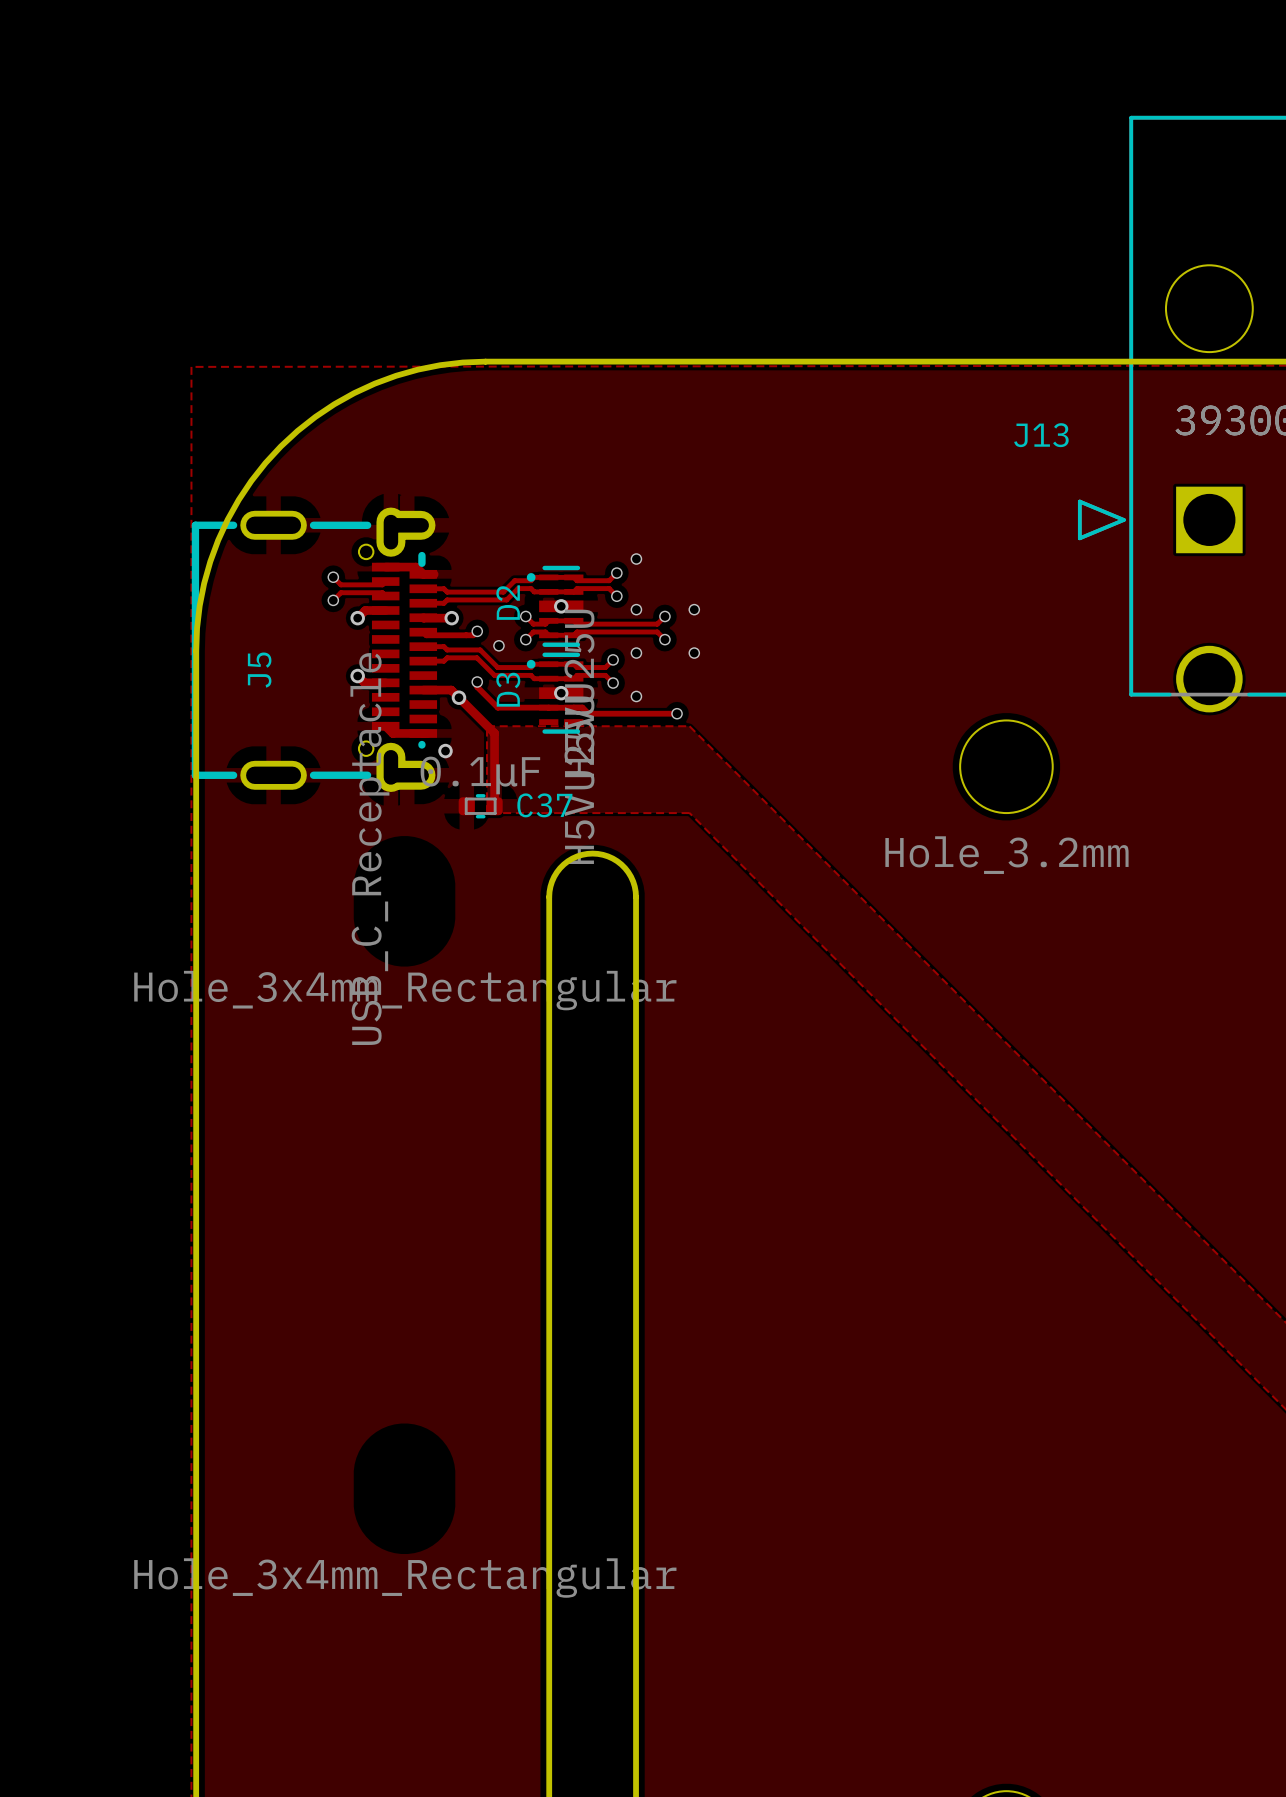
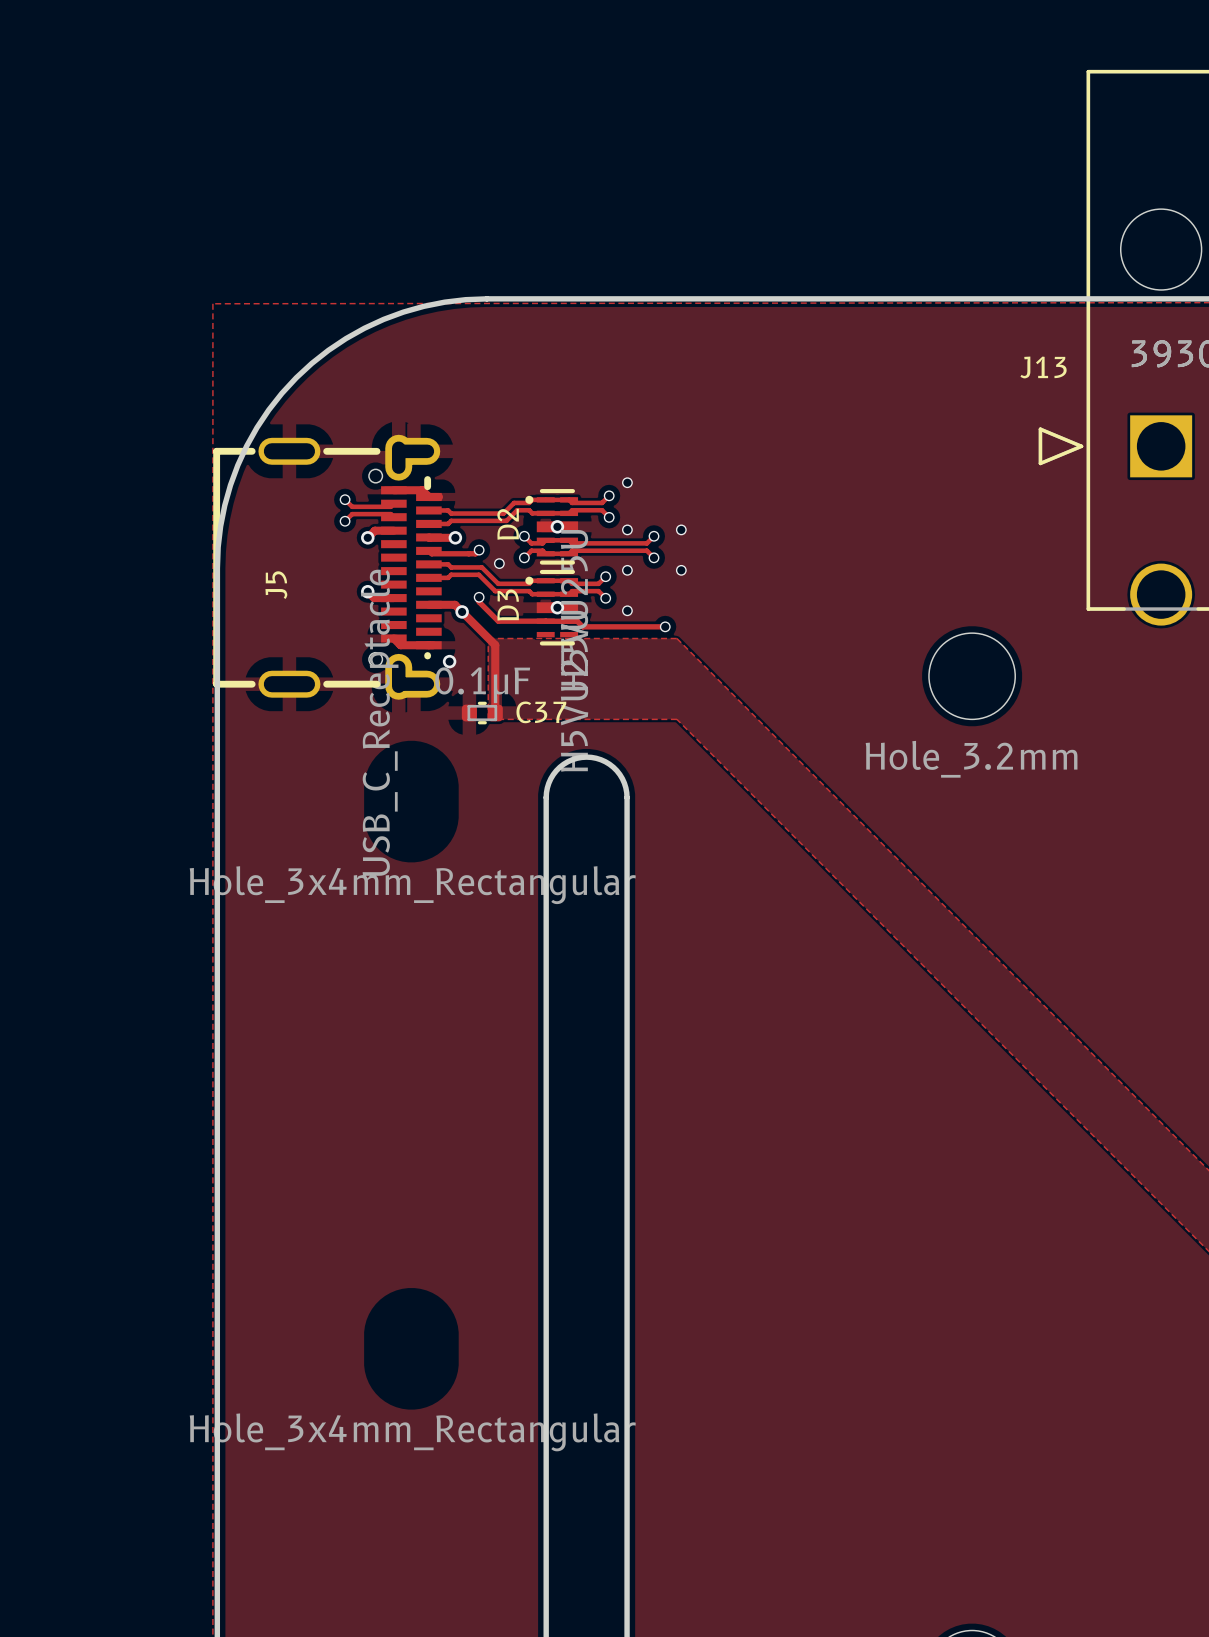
J13 name position: J13 (1041, 435) -> J13 (1043, 367)

